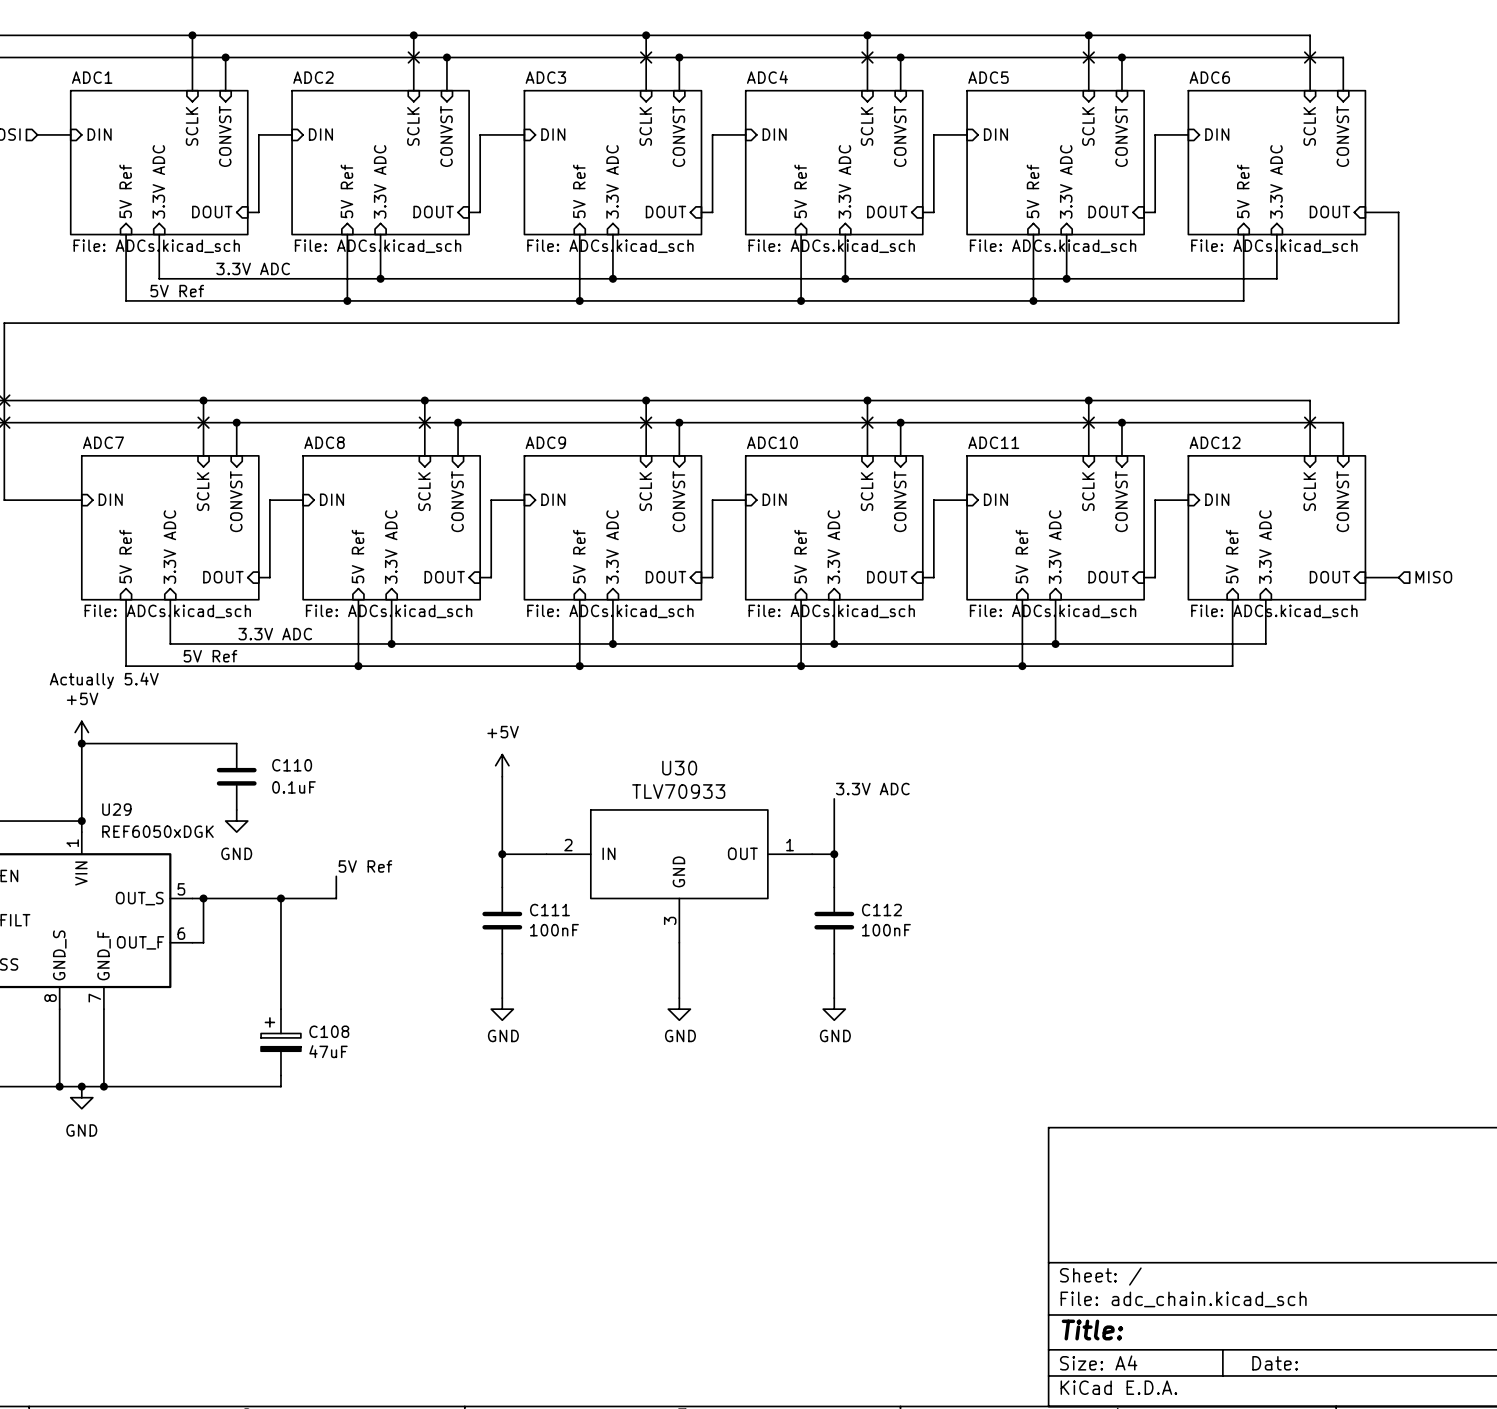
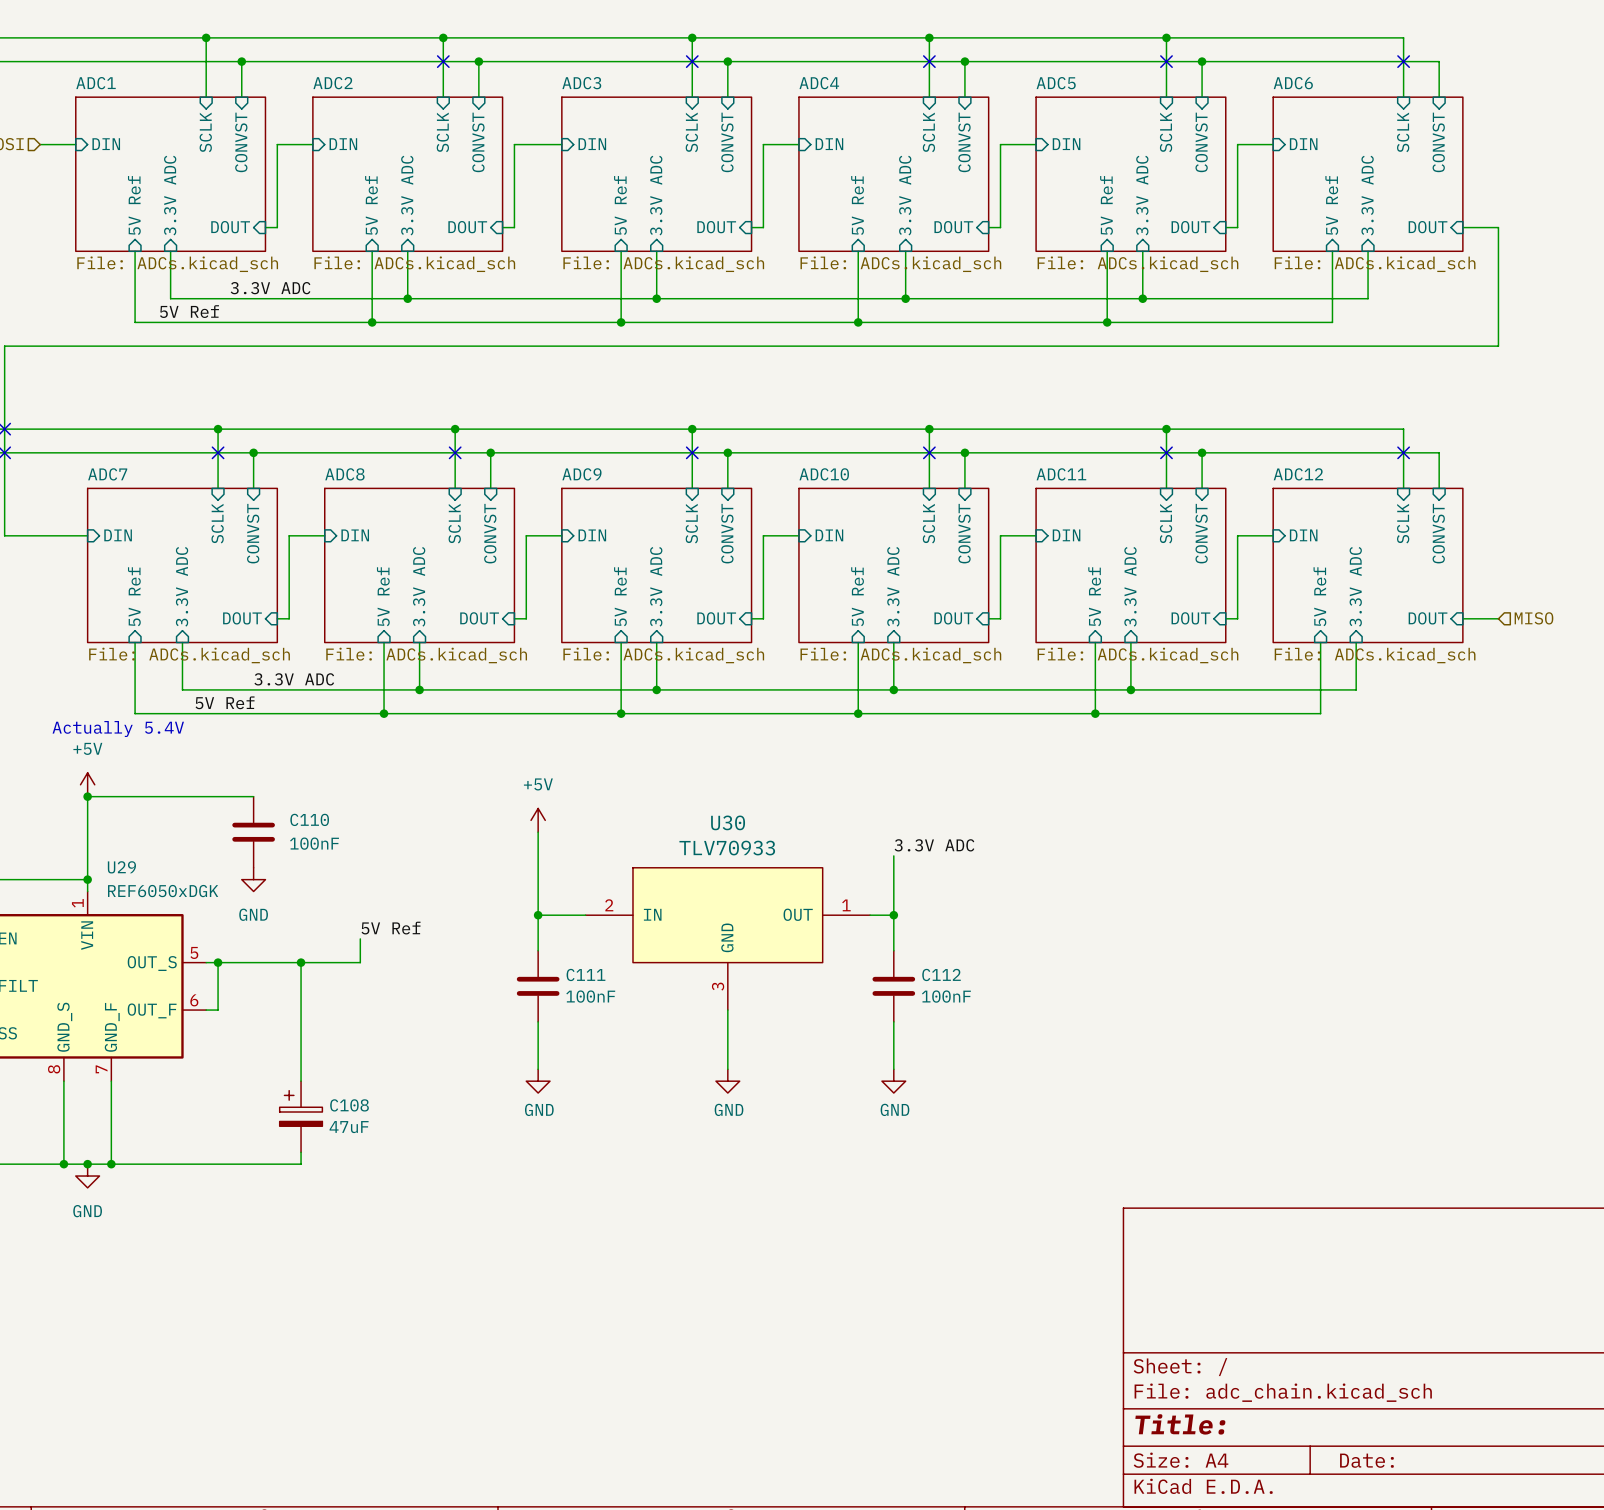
C110 value: 0.1uF (293, 787) -> 100nF (314, 843)

